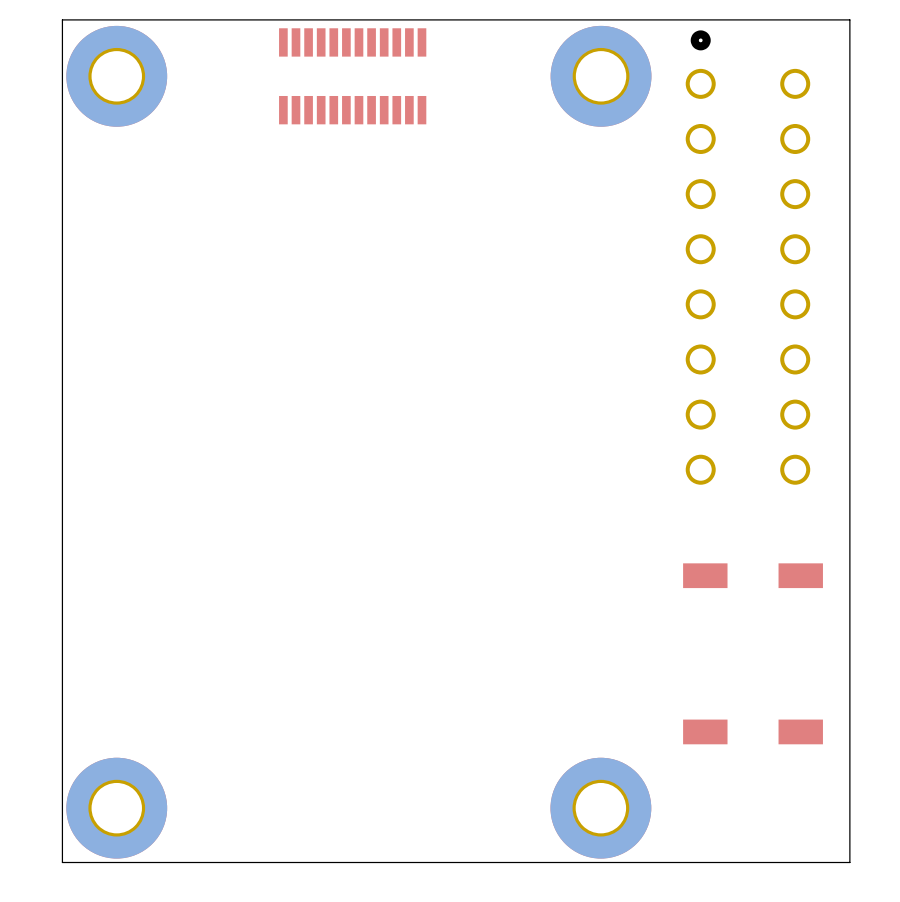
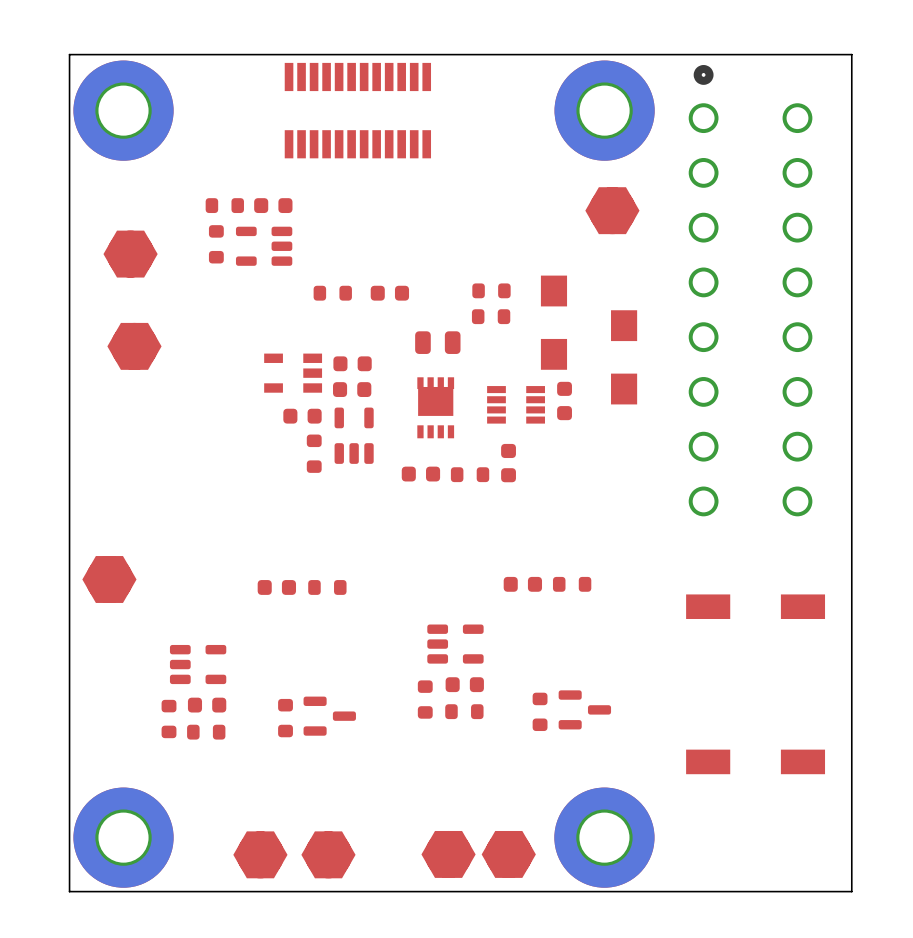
part: none -> (224, 205)
part: none -> (273, 205)
part: none -> (612, 210)
part: none -> (216, 244)
part: none -> (264, 246)
part: none -> (130, 254)
part: none -> (491, 290)
part: none -> (332, 293)
part: none -> (389, 293)
part: none -> (491, 316)
part: none -> (553, 322)
part: none -> (437, 342)
part: none -> (134, 346)
part: none -> (624, 357)
part: none -> (352, 363)
part: none -> (293, 373)
part: none -> (352, 389)
part: none -> (564, 400)
part: none -> (516, 404)
part: none -> (435, 407)
part: none -> (302, 416)
part: none -> (354, 435)
part: none -> (314, 453)
part: none -> (508, 463)
part: none -> (420, 474)
part: none -> (470, 474)
part: none -> (109, 579)
part: none -> (522, 584)
part: none -> (572, 584)
part: none -> (276, 587)
part: none -> (327, 587)
part: none -> (455, 644)
part: none -> (198, 664)
part: none -> (464, 684)
part: none -> (425, 699)
part: none -> (207, 705)
part: none -> (584, 709)
part: none -> (464, 711)
part: none -> (540, 711)
part: none -> (329, 716)
part: none -> (285, 718)
part: none -> (169, 719)
part: none -> (206, 732)
part: none -> (260, 854)
part: none -> (328, 854)
part: none -> (448, 854)
part: none -> (508, 854)

